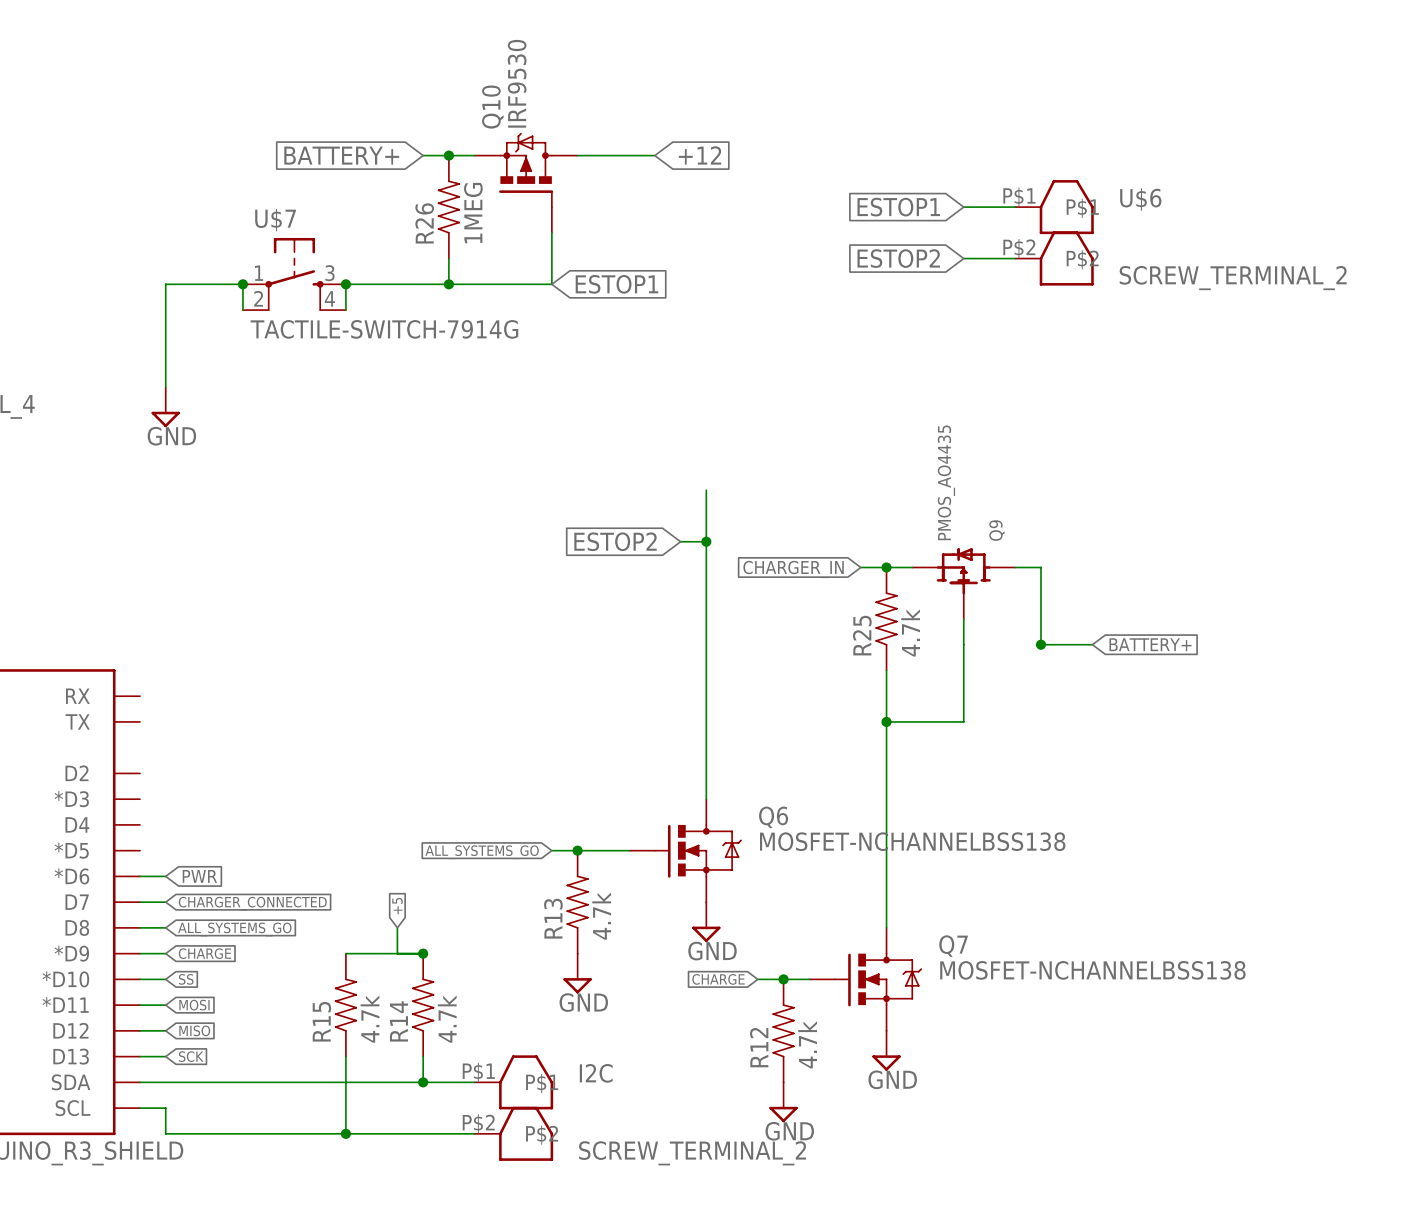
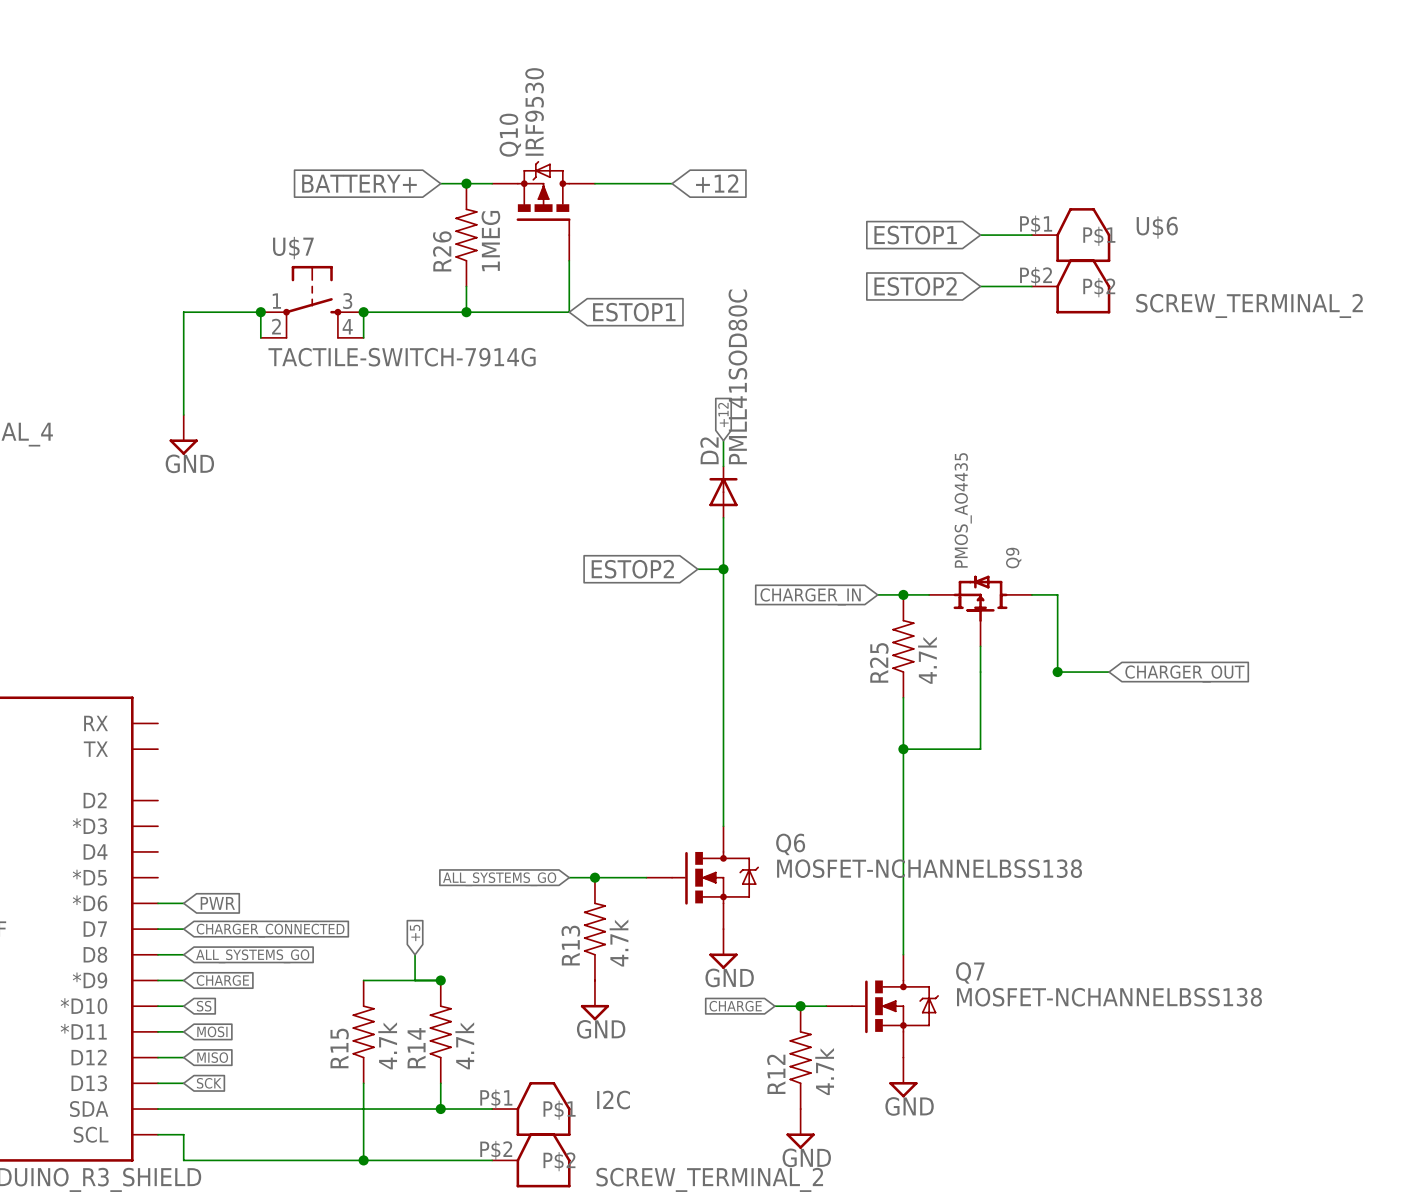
global label: none -> +12 (723, 414)
wire: none -> (723, 440) (723, 466)
D2: none -> PMLL41SOD80C (723, 492)
global label: BATTERY+ (1150, 644) -> CHARGER_OUT (1184, 674)

